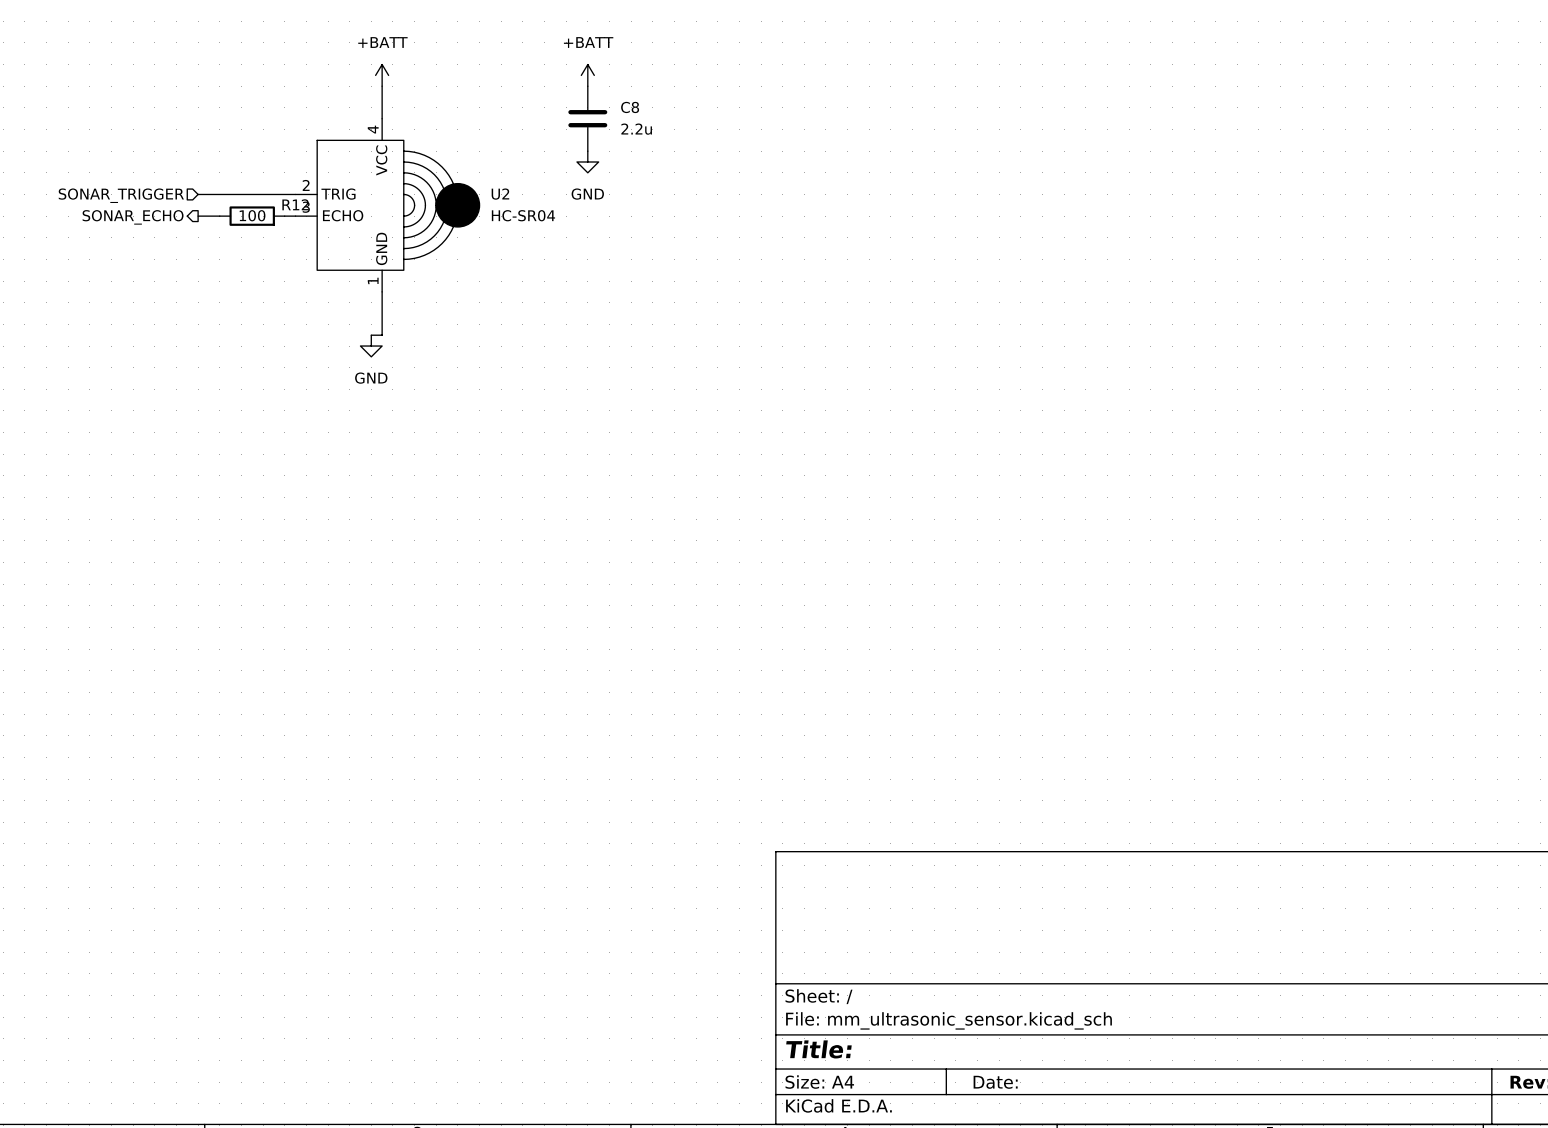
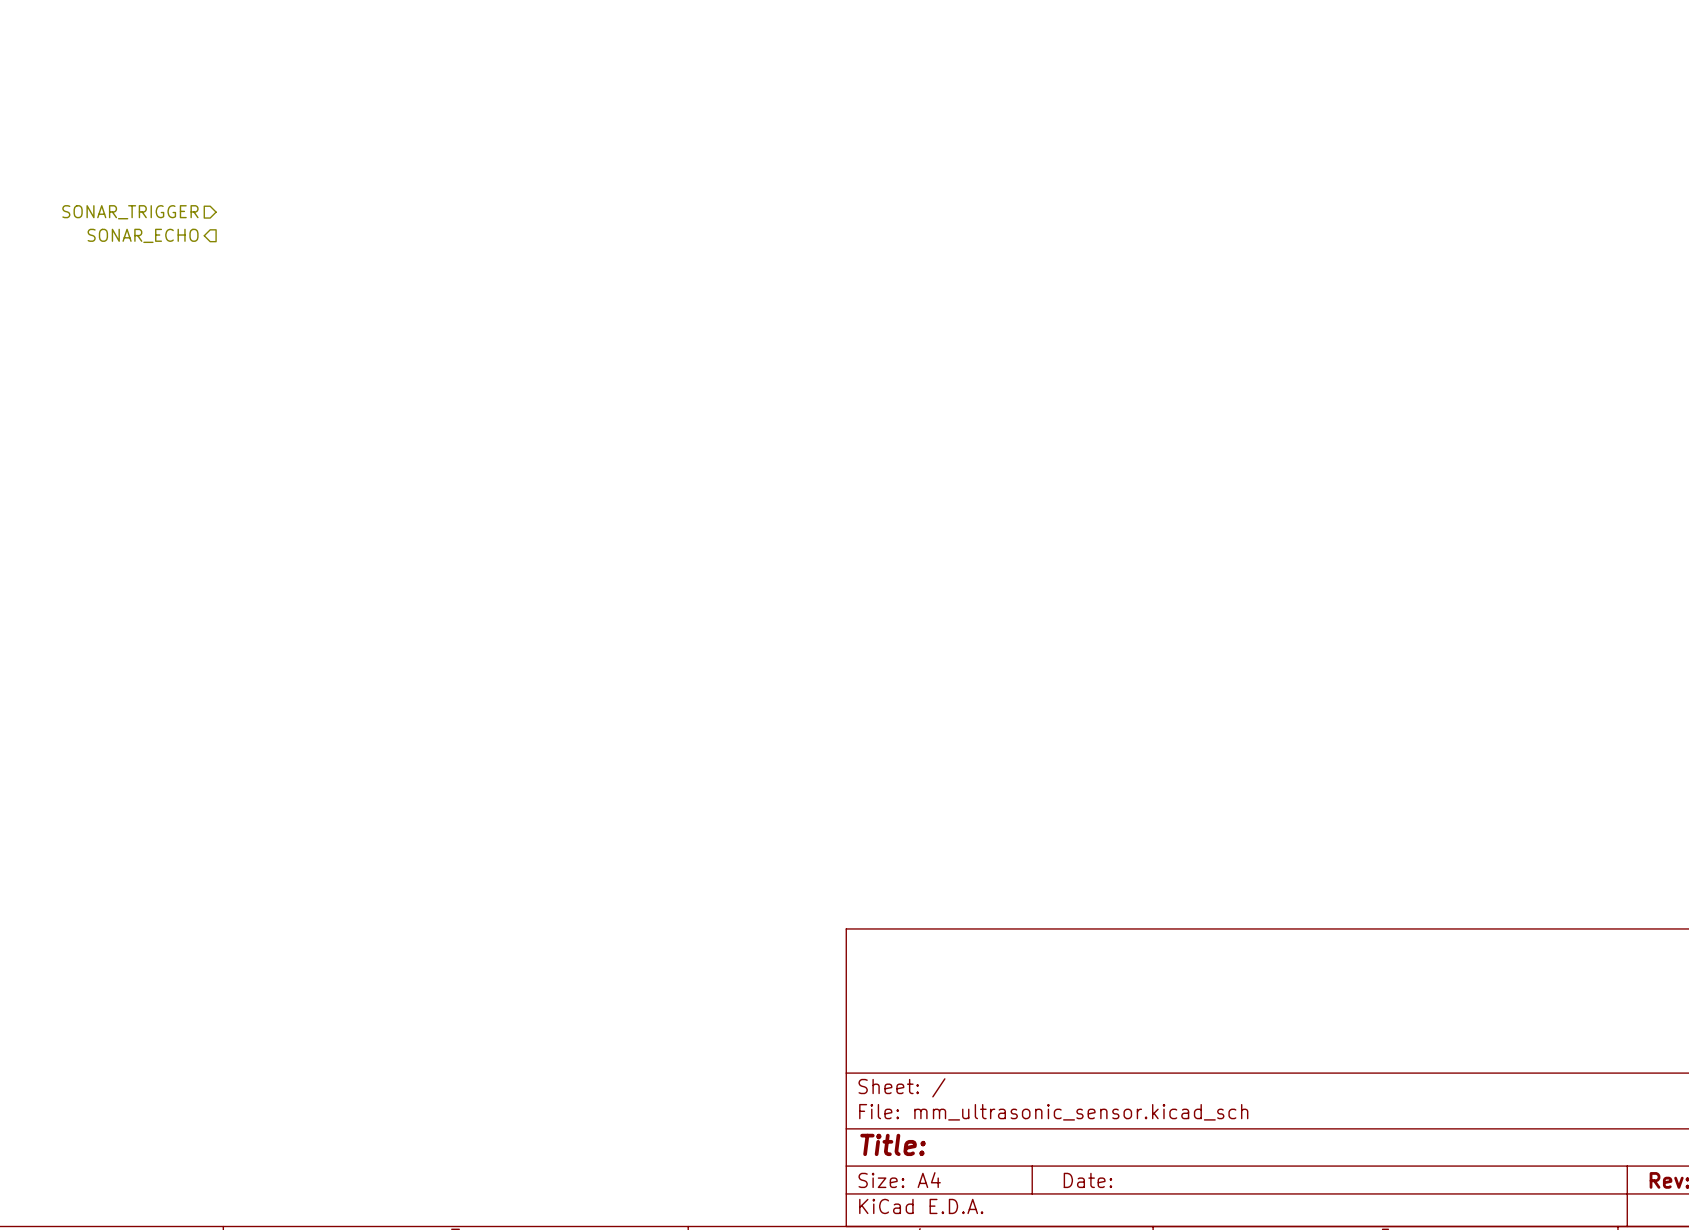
power symbol: +BATT (382, 75) -> none
power symbol: +BATT (587, 75) -> none
wire: (382, 86) (382, 118) -> none
C8: 2.2u (587, 118) -> none
power symbol: GND (587, 161) -> none
wire: (198, 194) (295, 194) -> none
U2: HC-SR04 (387, 205) -> none
wire: (198, 216) (219, 216) -> none
R12: 100 (252, 216) -> none
wire: (284, 216) (295, 216) -> none
wire: (382, 291) (382, 335) (371, 335) -> none
power symbol: GND (371, 346) -> none

